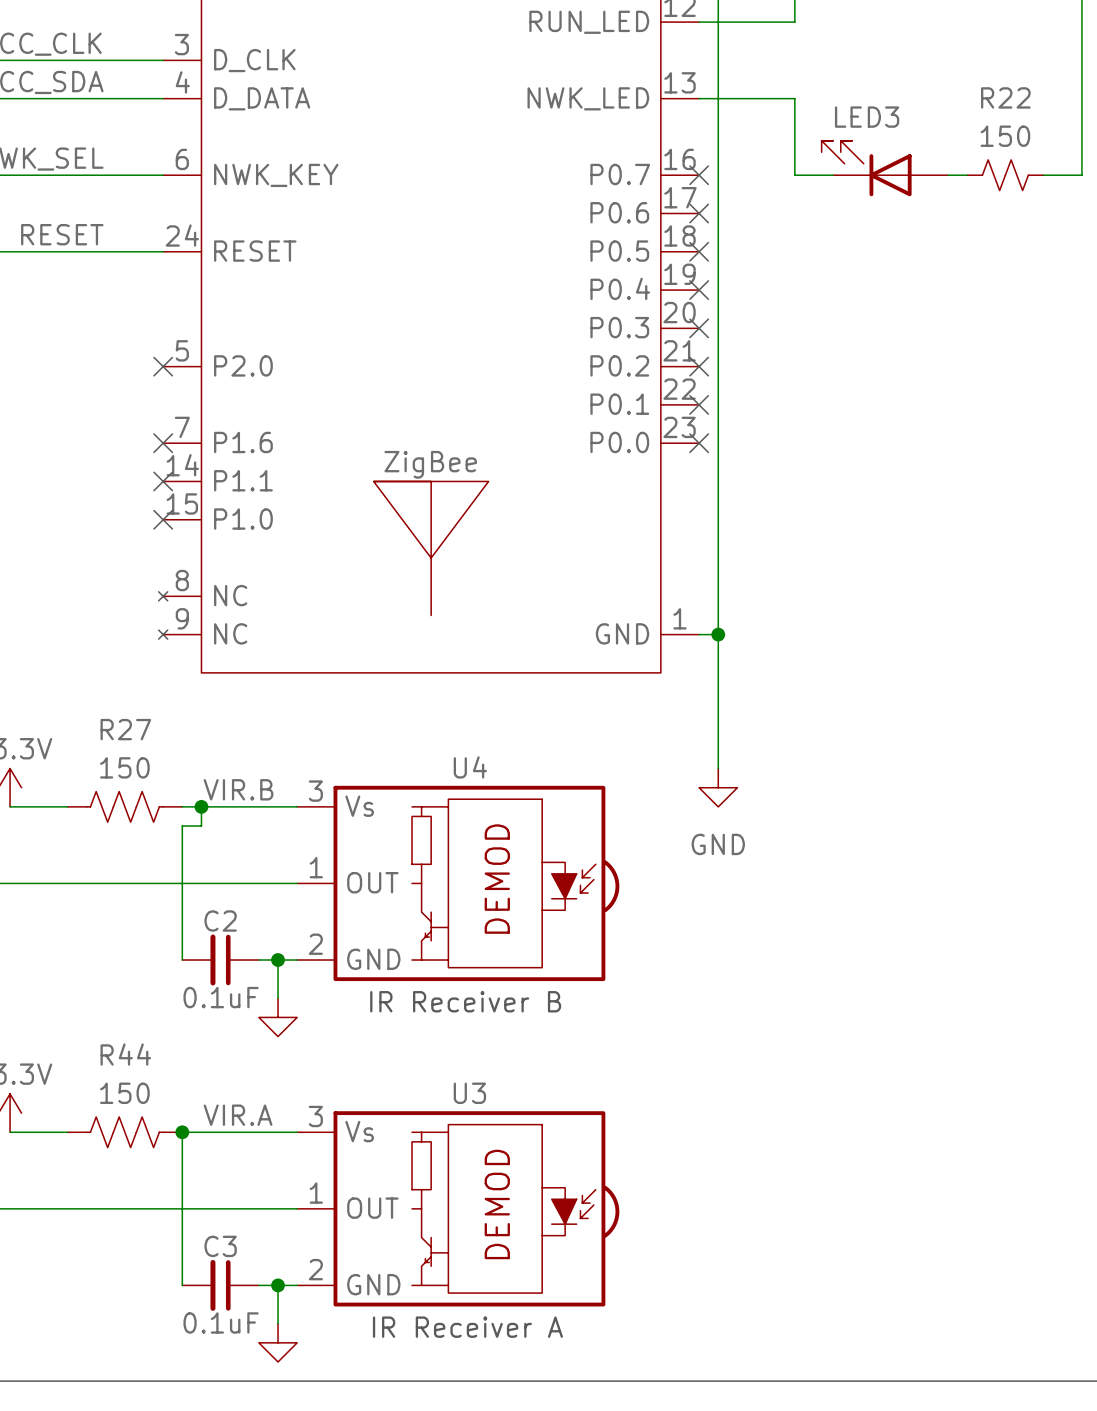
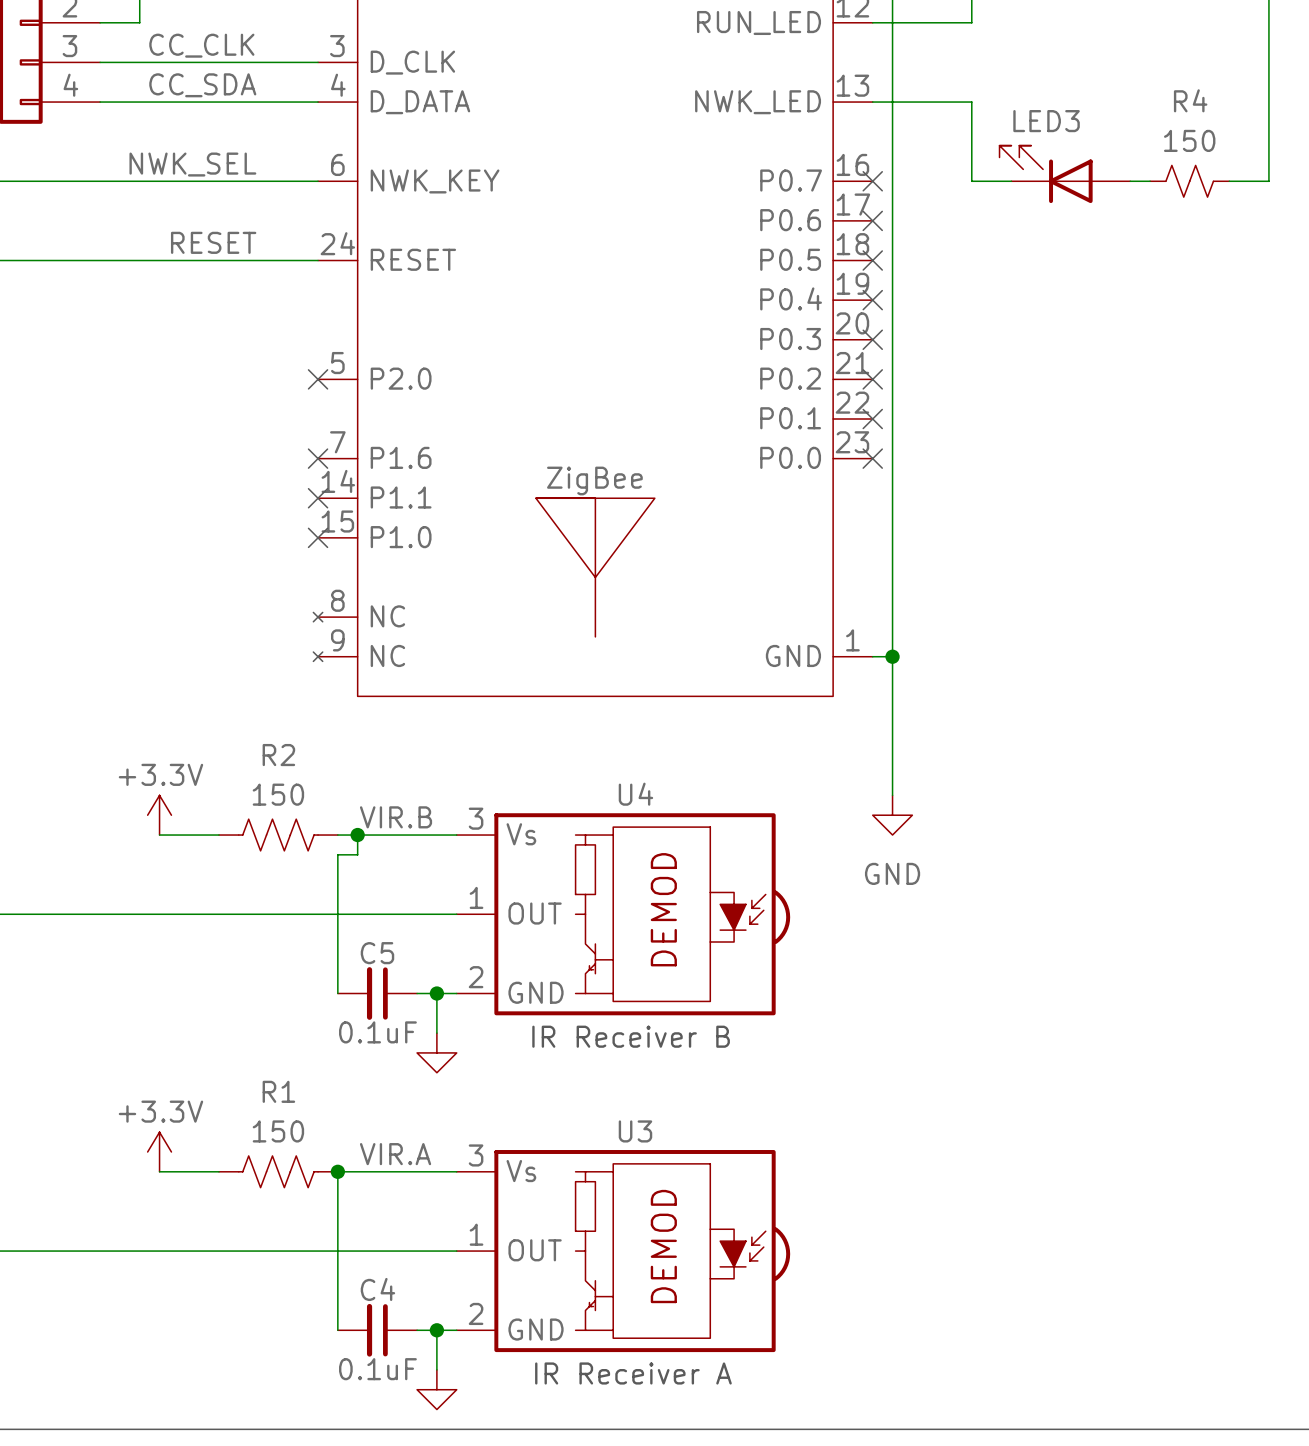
R22 name: R22 (1005, 97) -> R4 (1190, 100)
R27 name: R27 (125, 729) -> R2 (278, 755)
C2 name: C2 (220, 921) -> C5 (377, 953)
R44 name: R44 (125, 1054) -> R1 (278, 1091)
C3 name: C3 (220, 1246) -> C4 (377, 1289)

